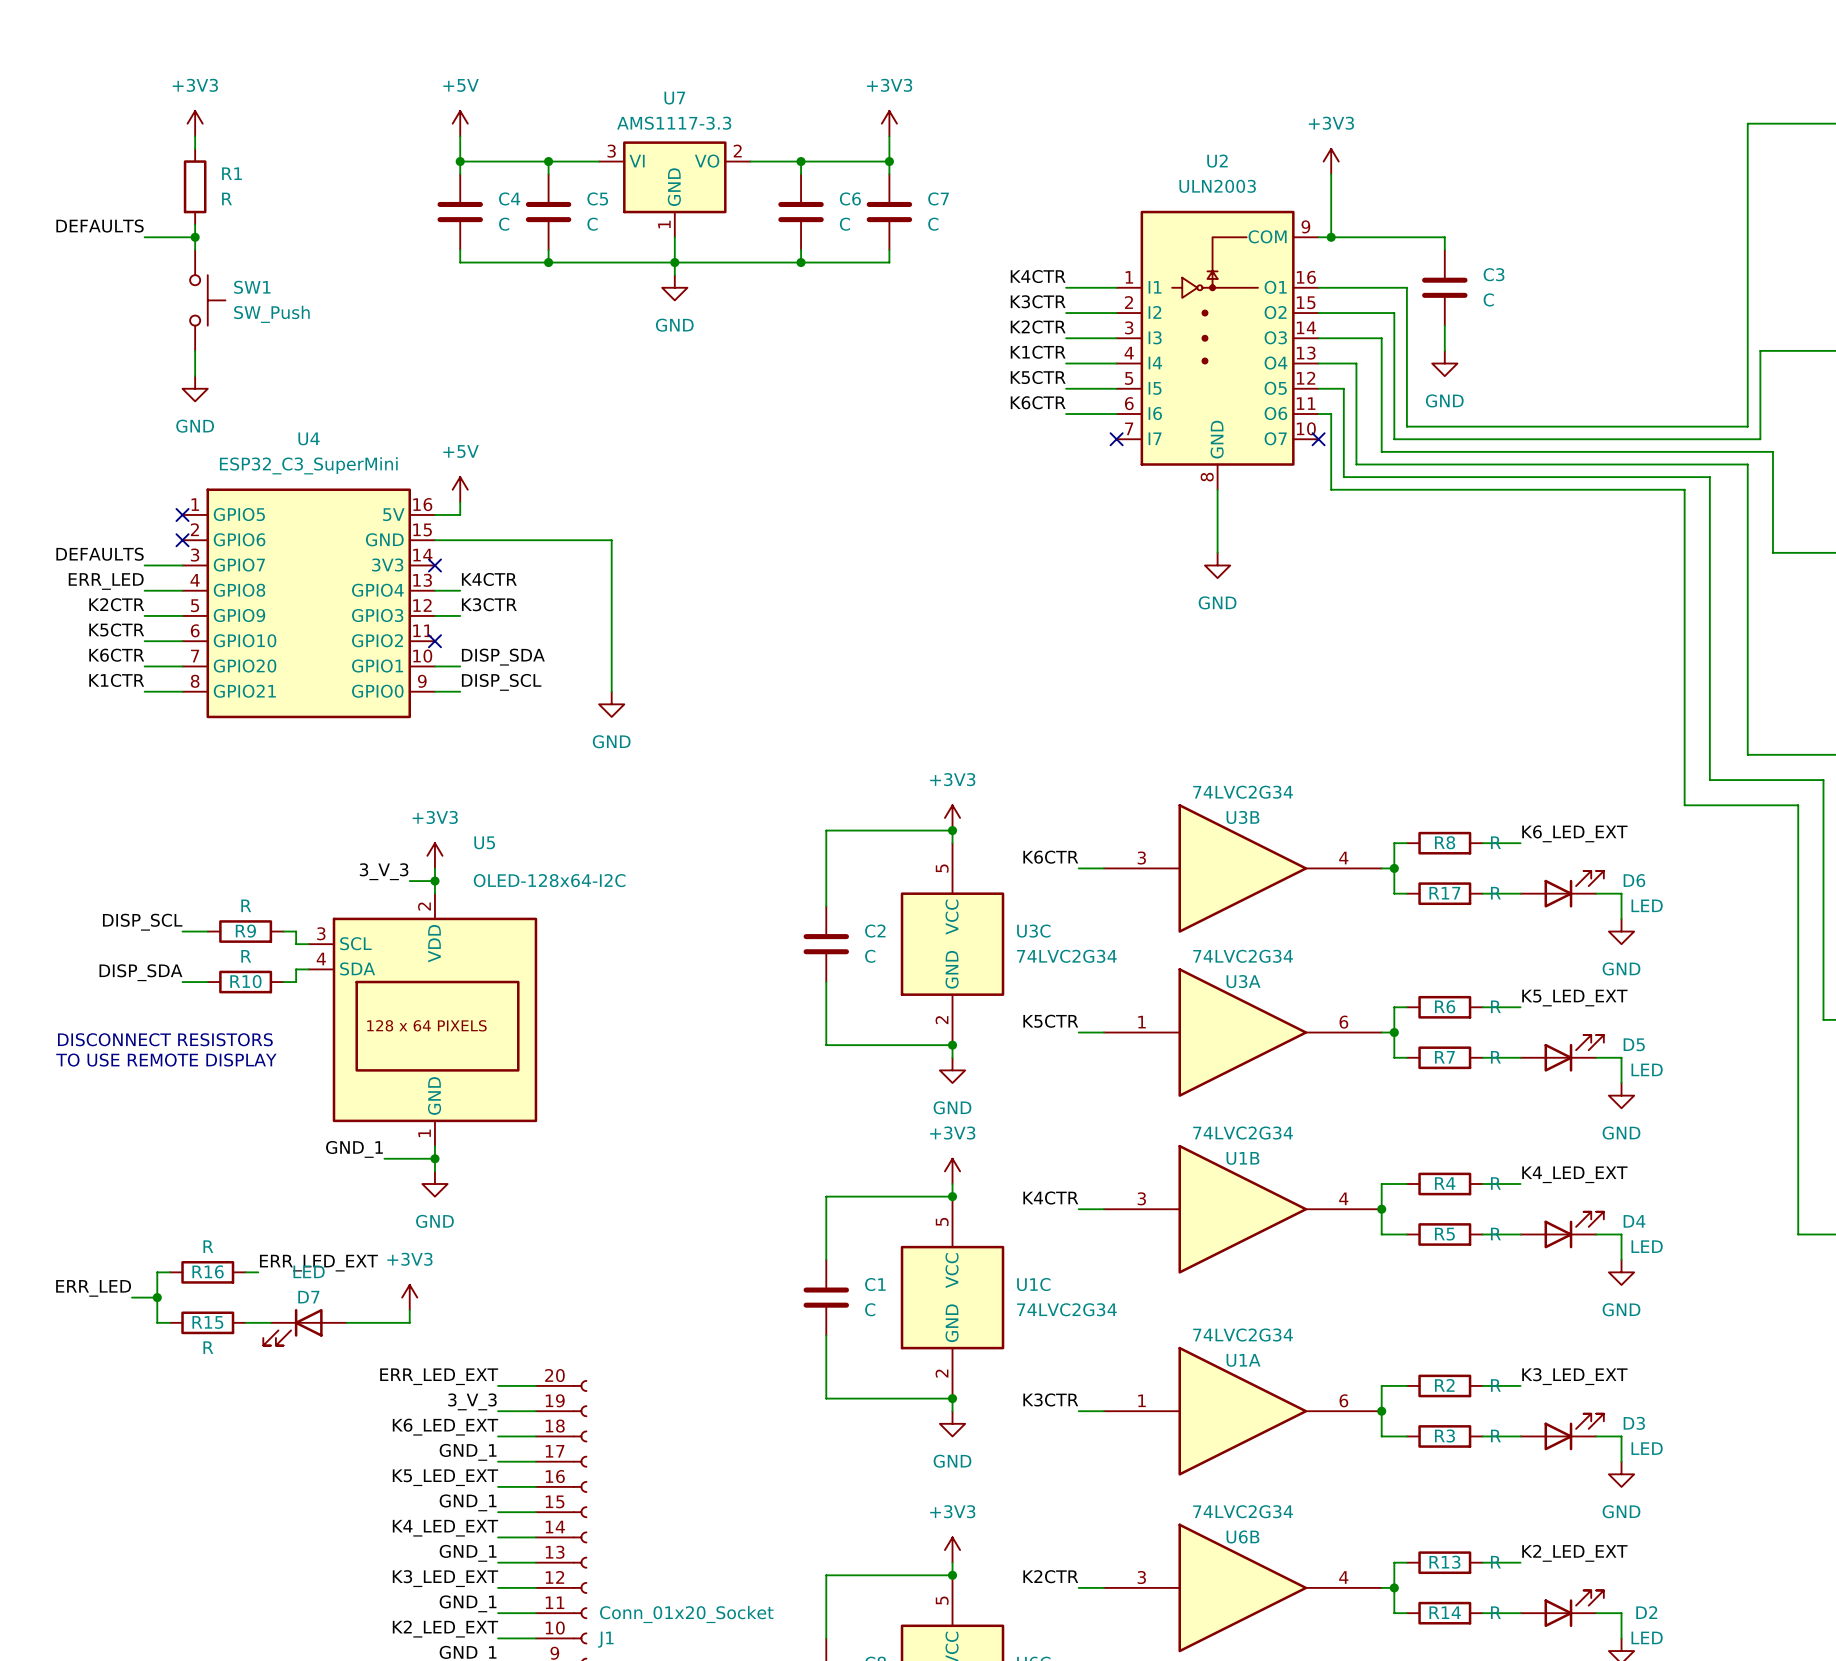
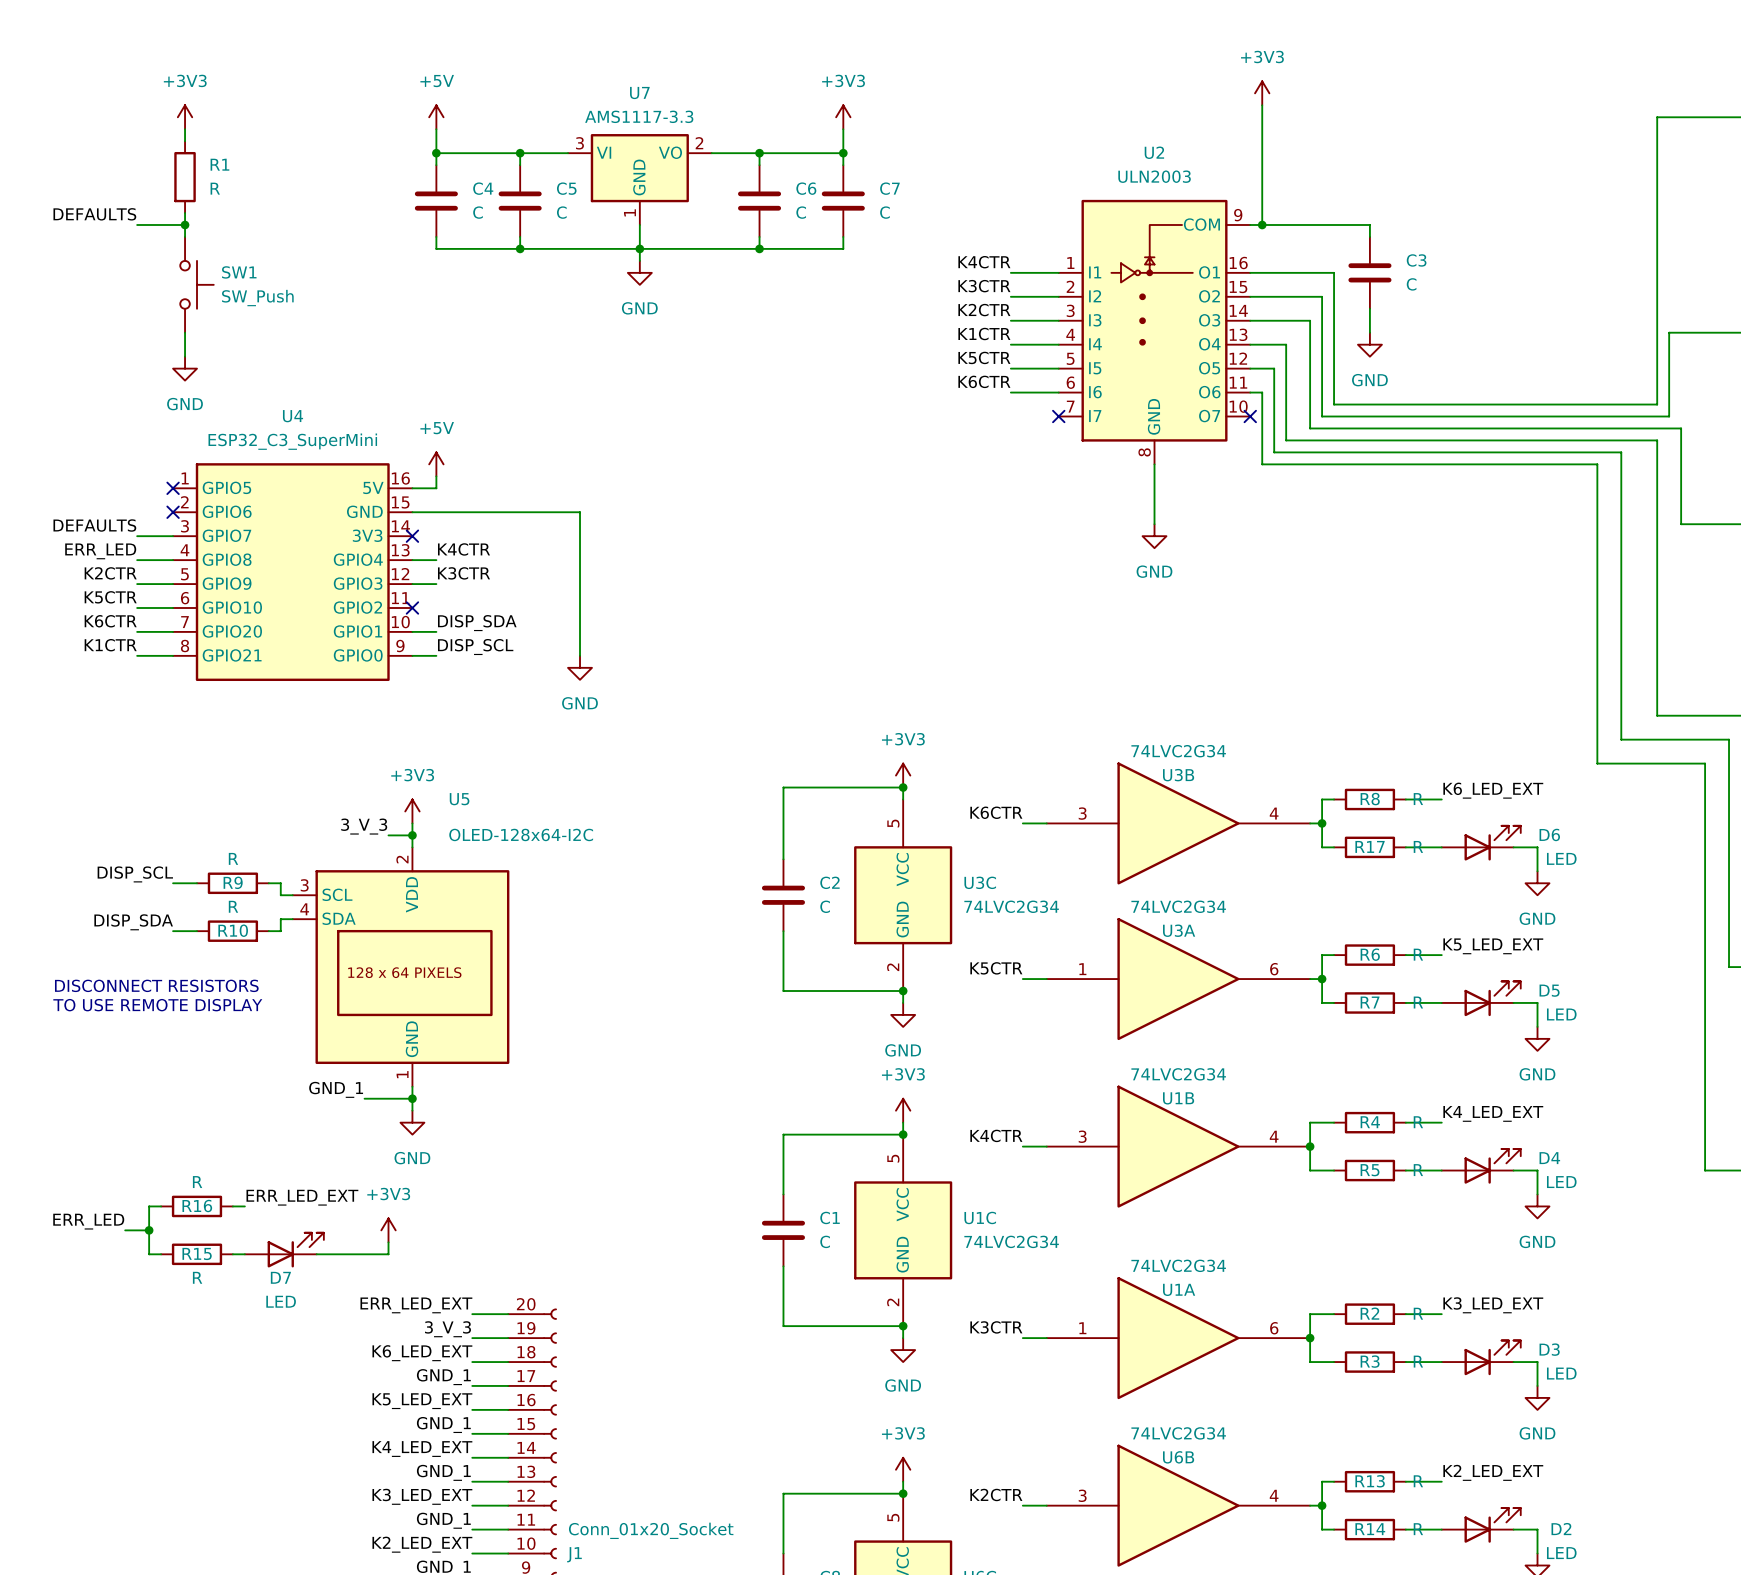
wire: none -> (1262, 105) (1262, 165)
power symbol position: +3V3 (1331, 161) -> +3V3 (1262, 93)
D7 rotation: 0° (292, 1327) -> 180° (295, 1250)

